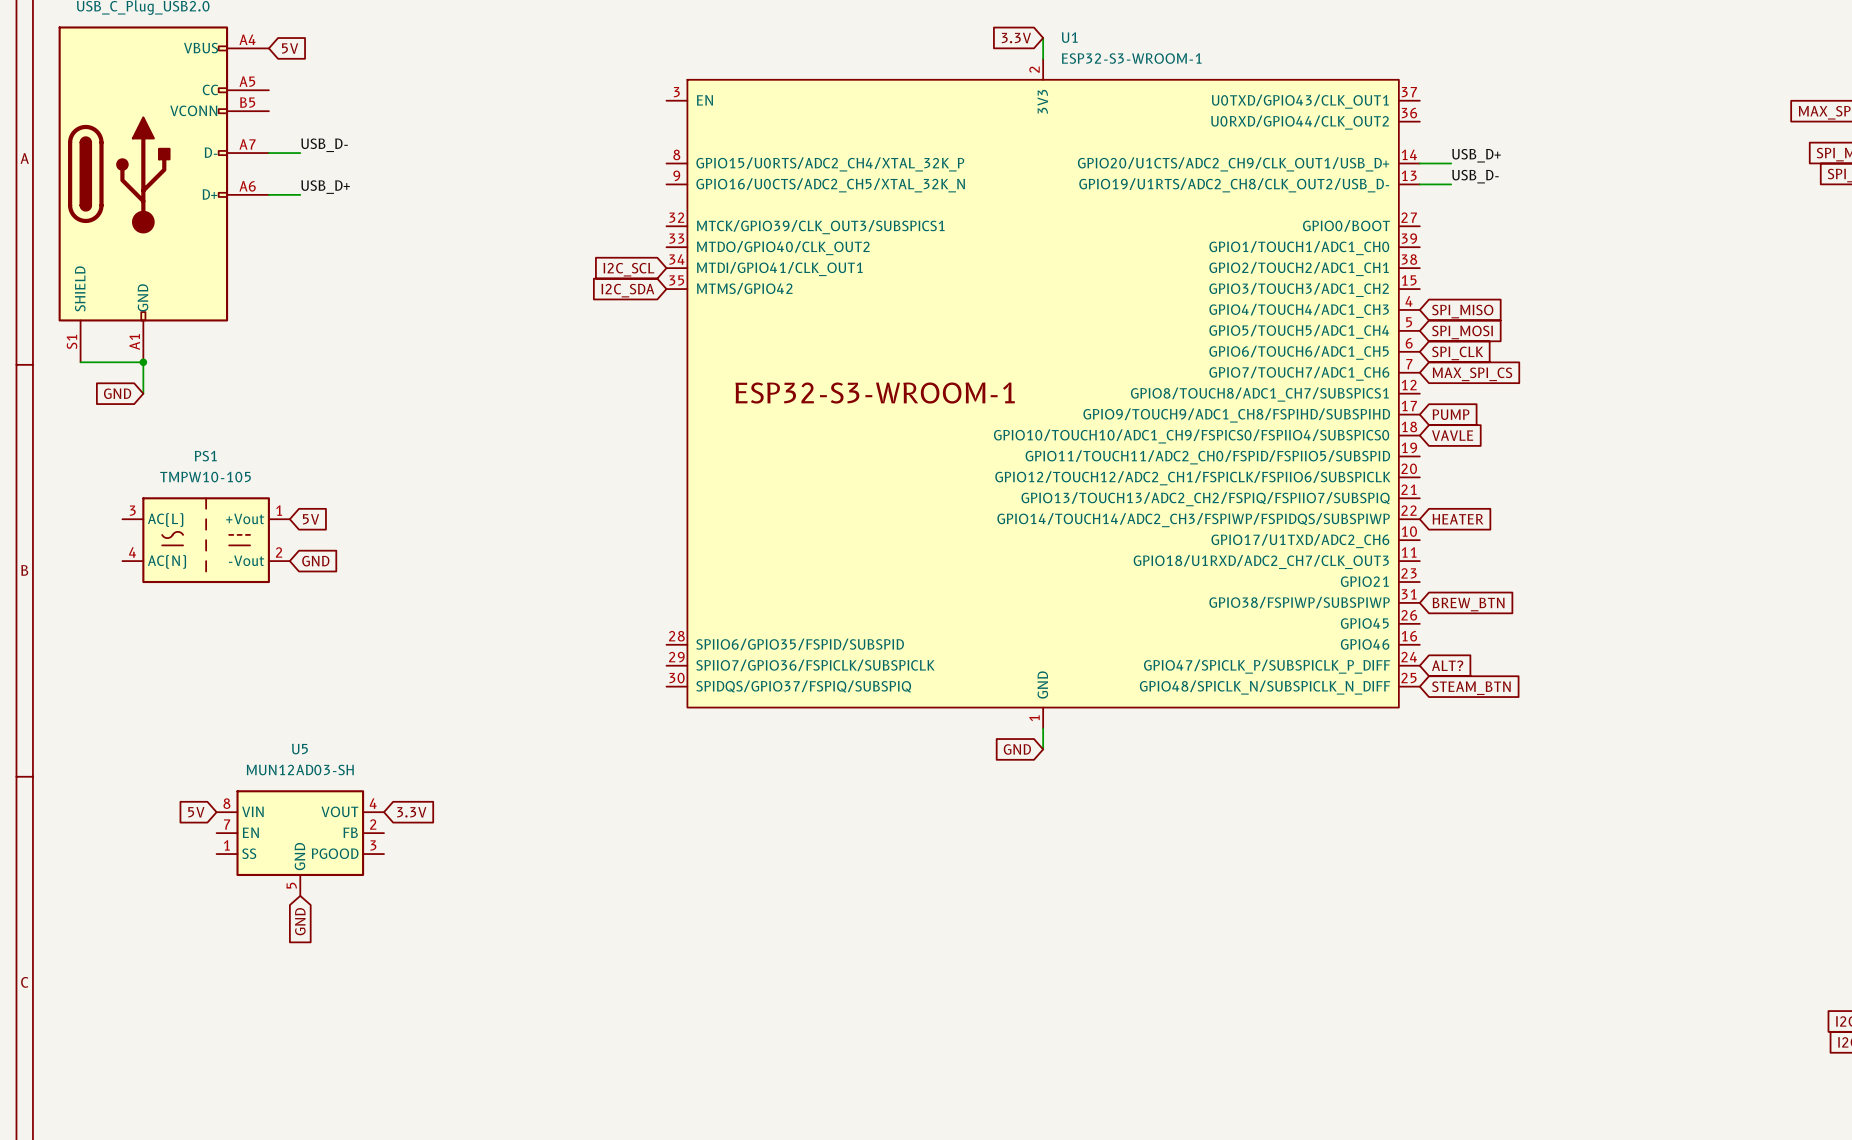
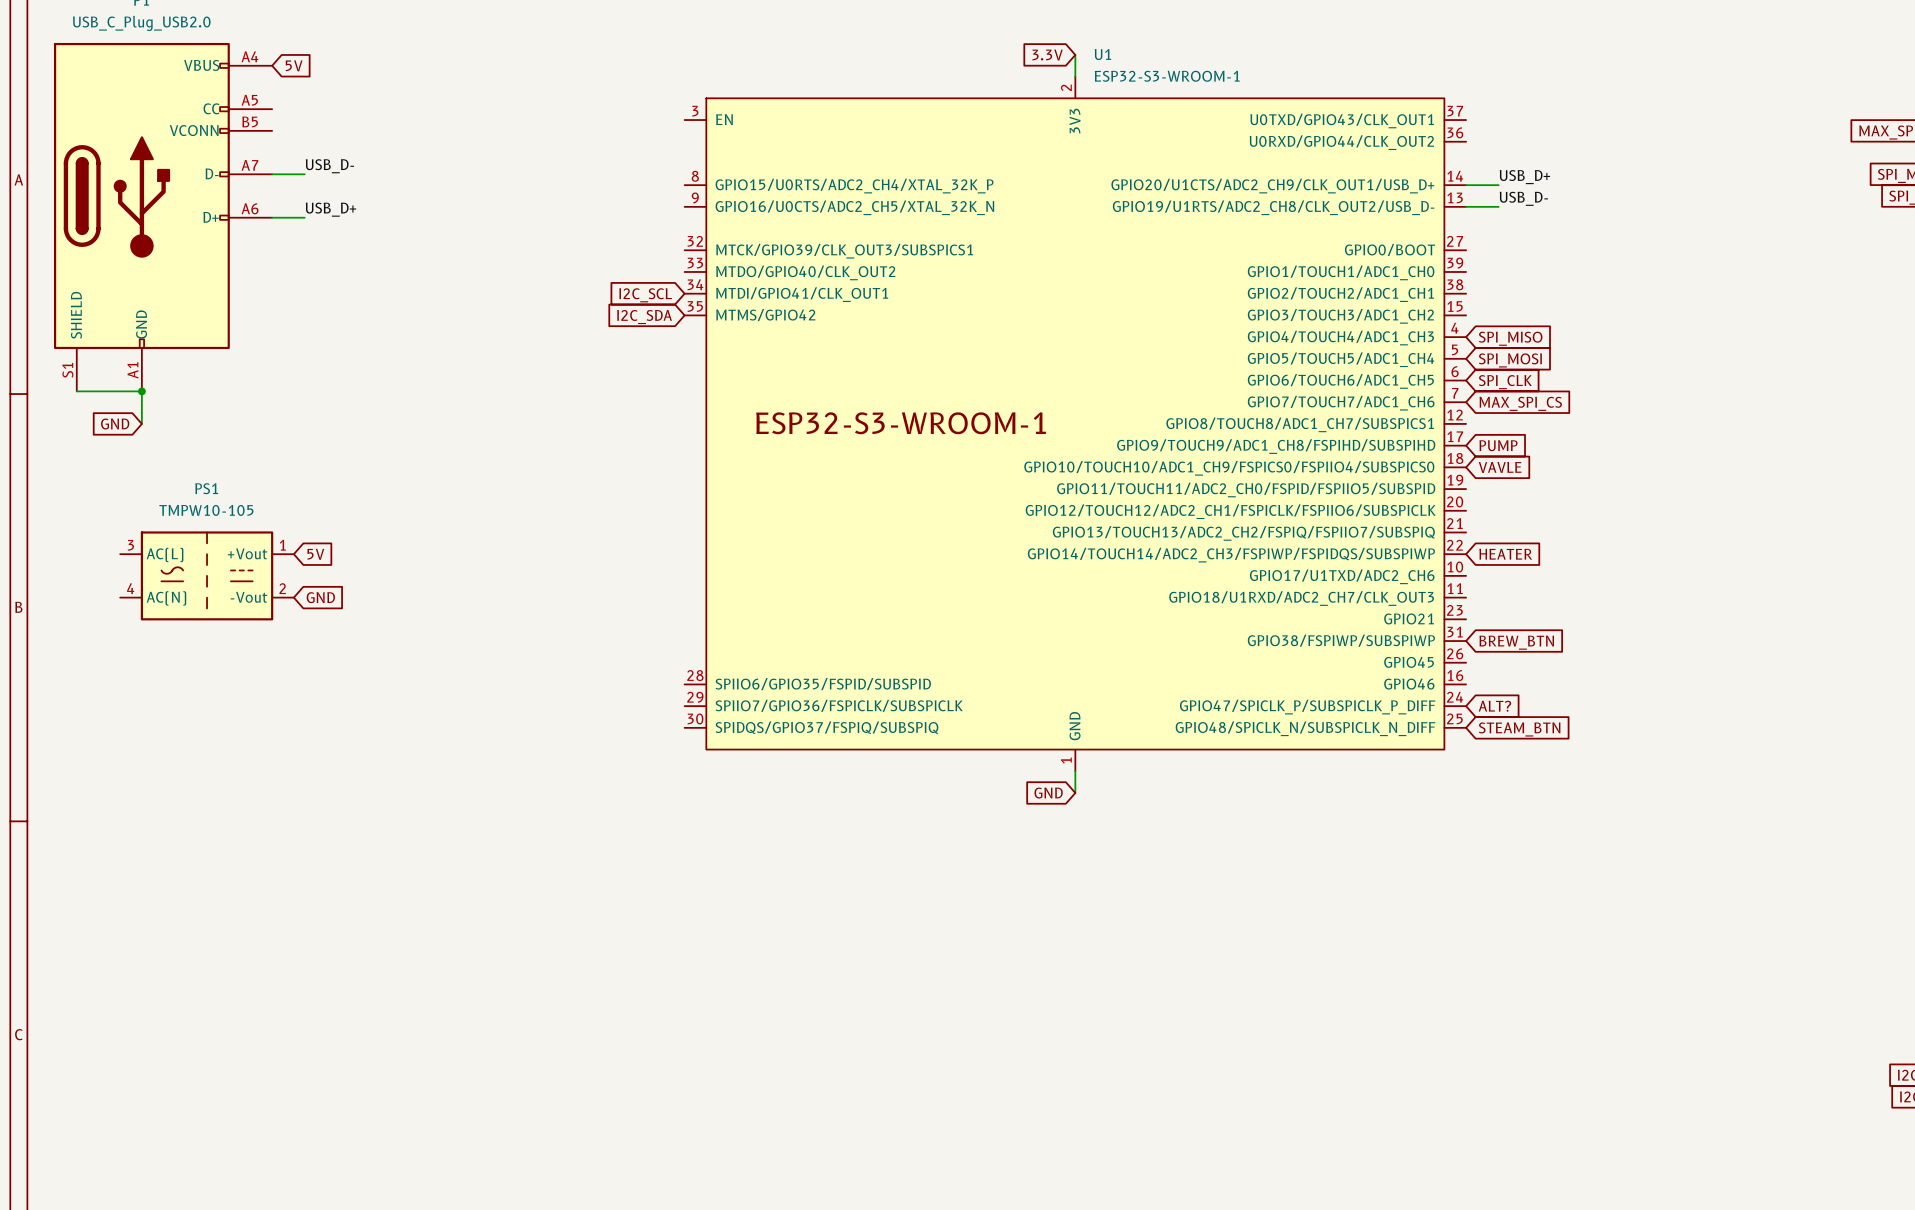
global label: 5V (196, 812) -> none
global label: 3.3V (411, 812) -> none
U5: MUN12AD03-SH (300, 843) -> none
global label: GND (300, 921) -> none

